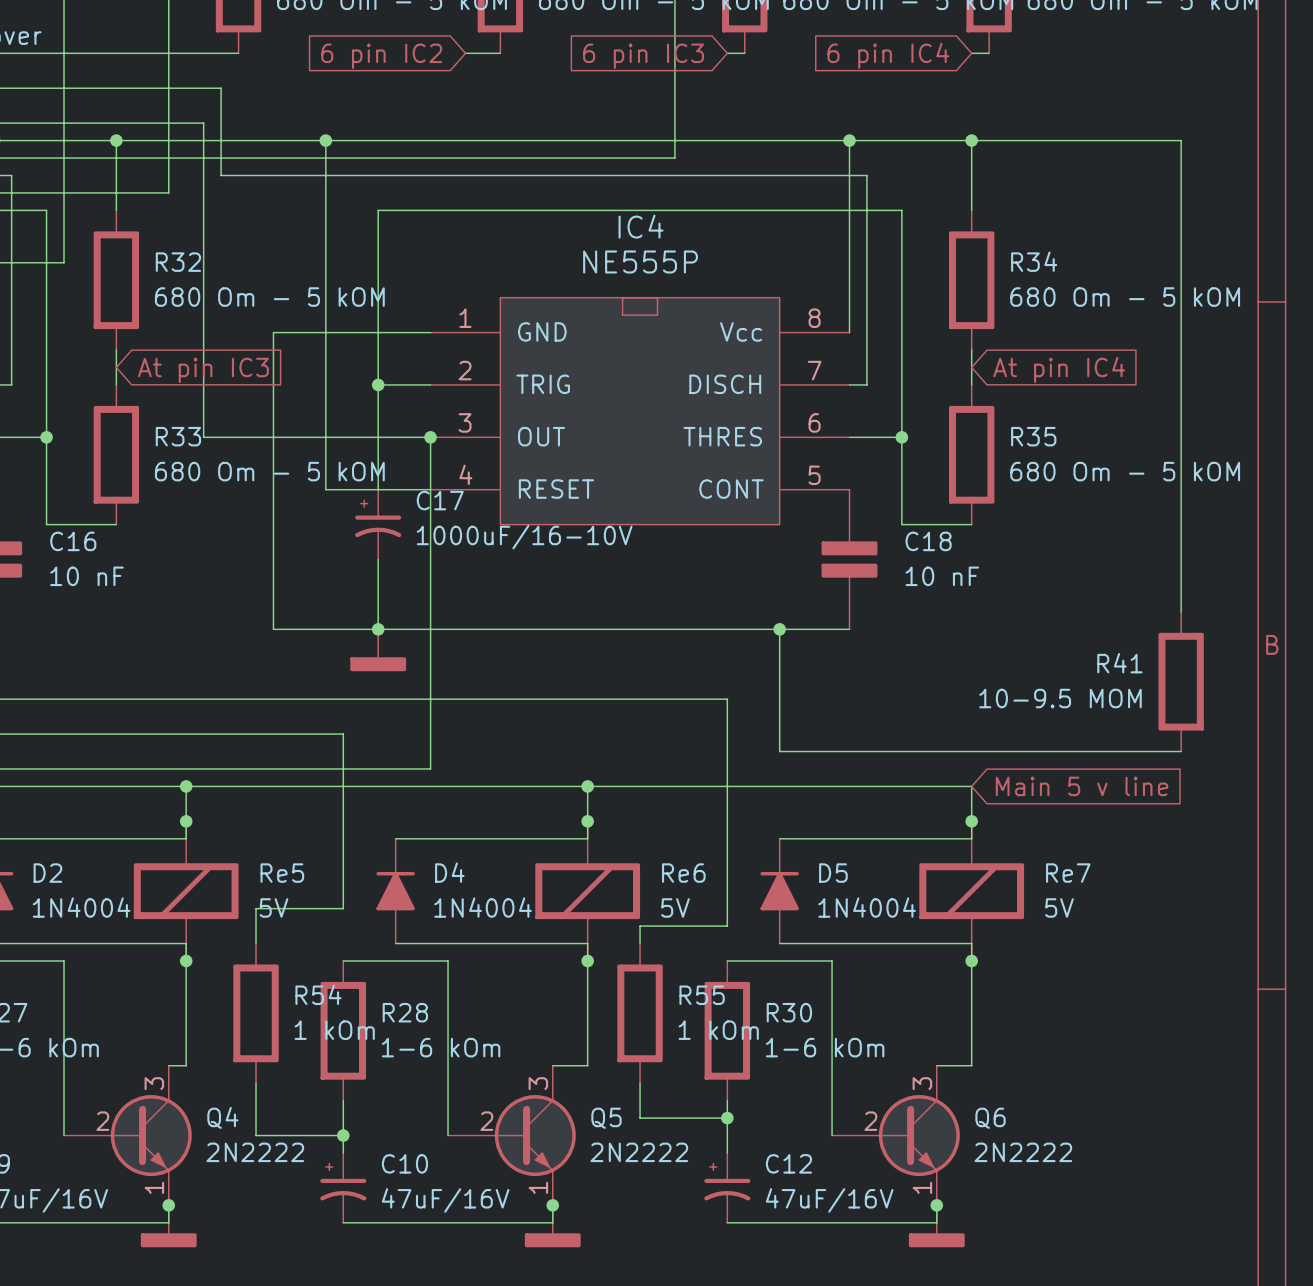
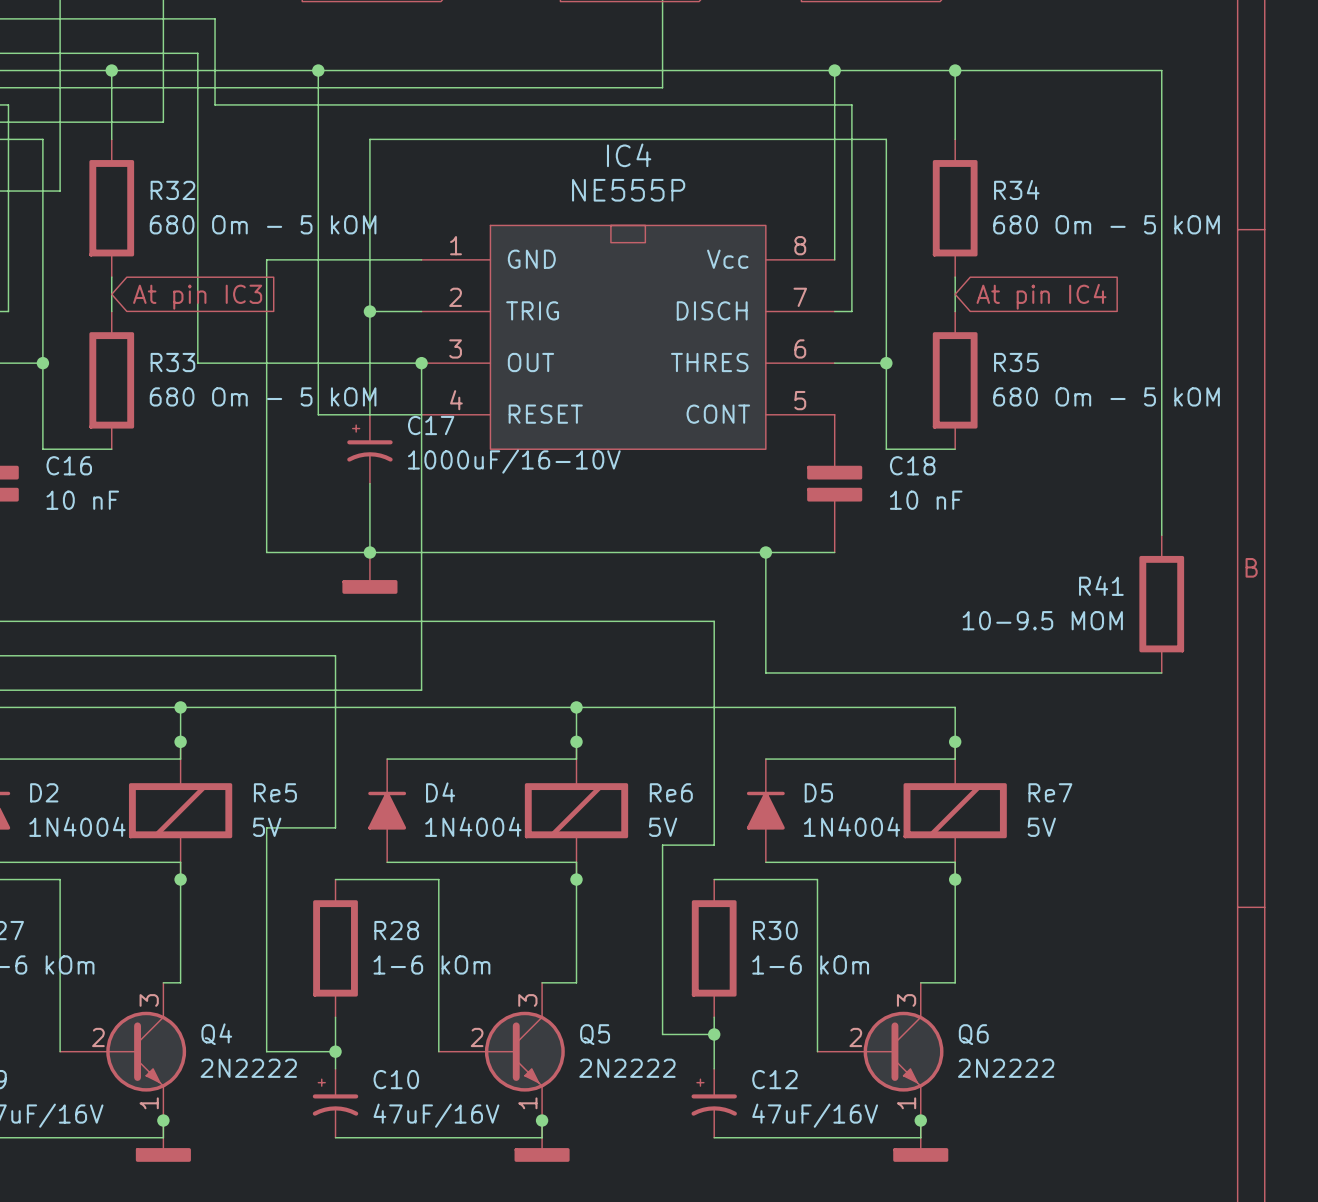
global label: Main 5 v line (1082, 786) -> none
wire: (273, 908) (256, 908) (256, 943) -> none
wire: (674, 926) (640, 926) (640, 943) -> none
R54: 1 kOm (256, 1013) -> none
R55: 1 kOm (640, 1013) -> none
wire: (256, 1083) (256, 1135) (273, 1135) -> (266, 827) (266, 1051)
wire: (640, 1083) (640, 1118) (674, 1118) -> (662, 845) (662, 1034)

